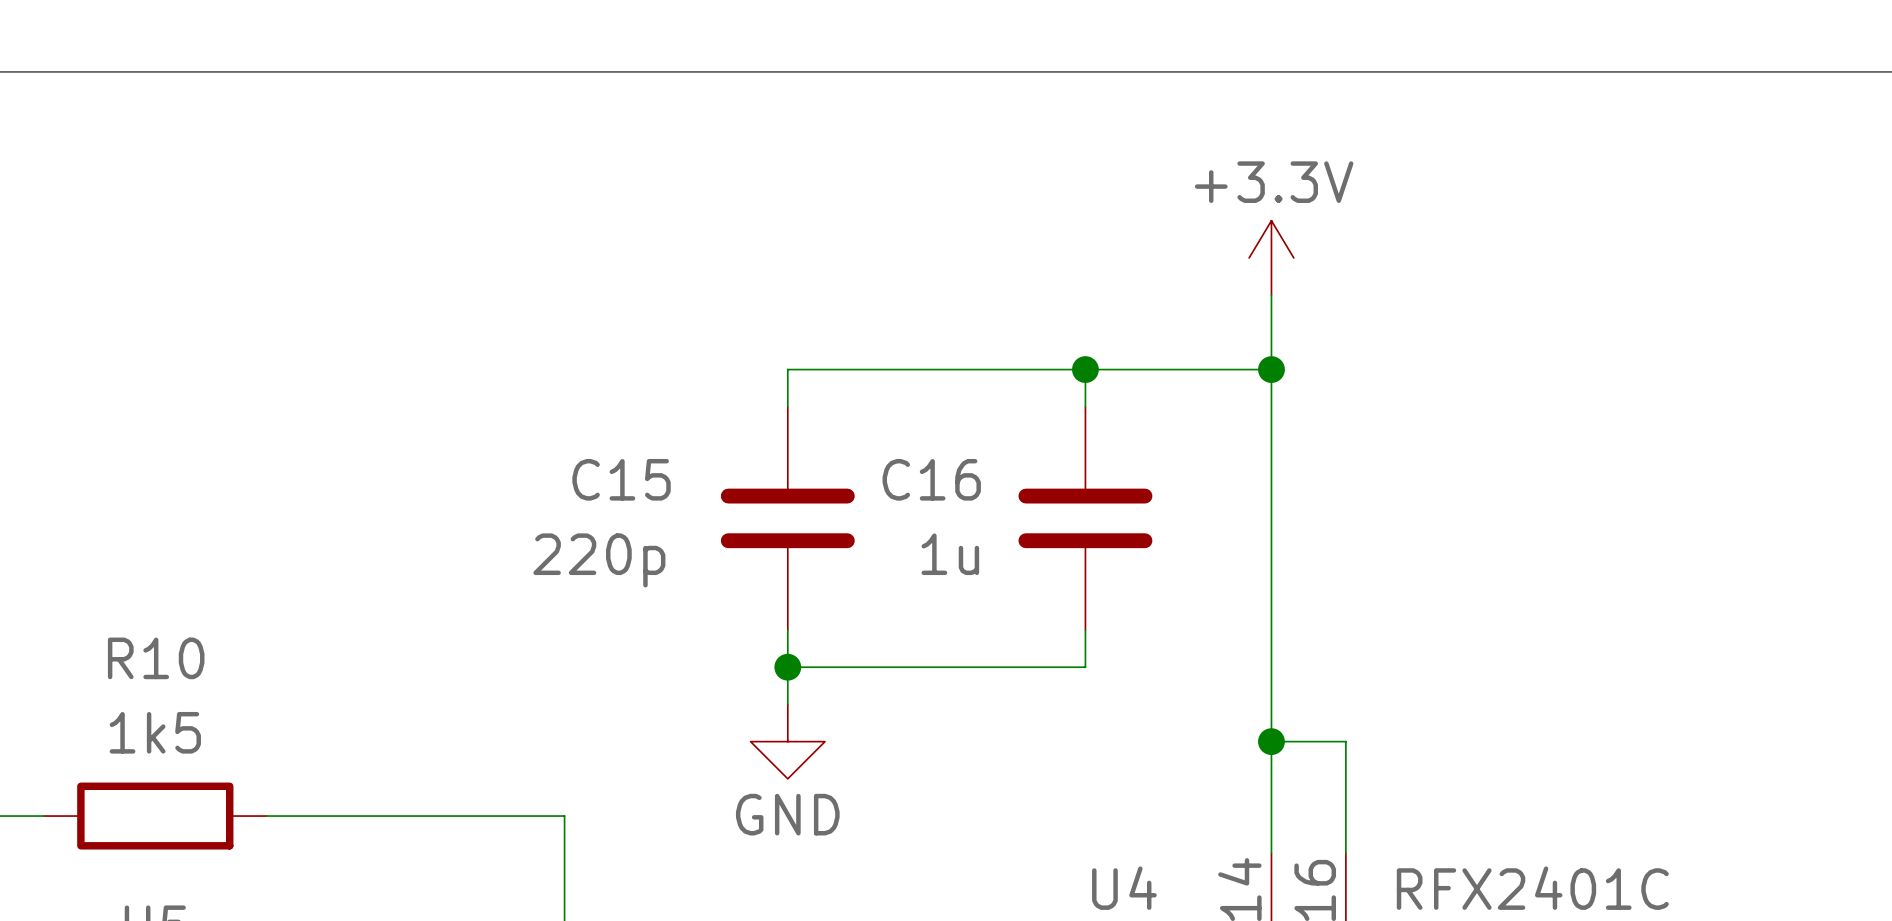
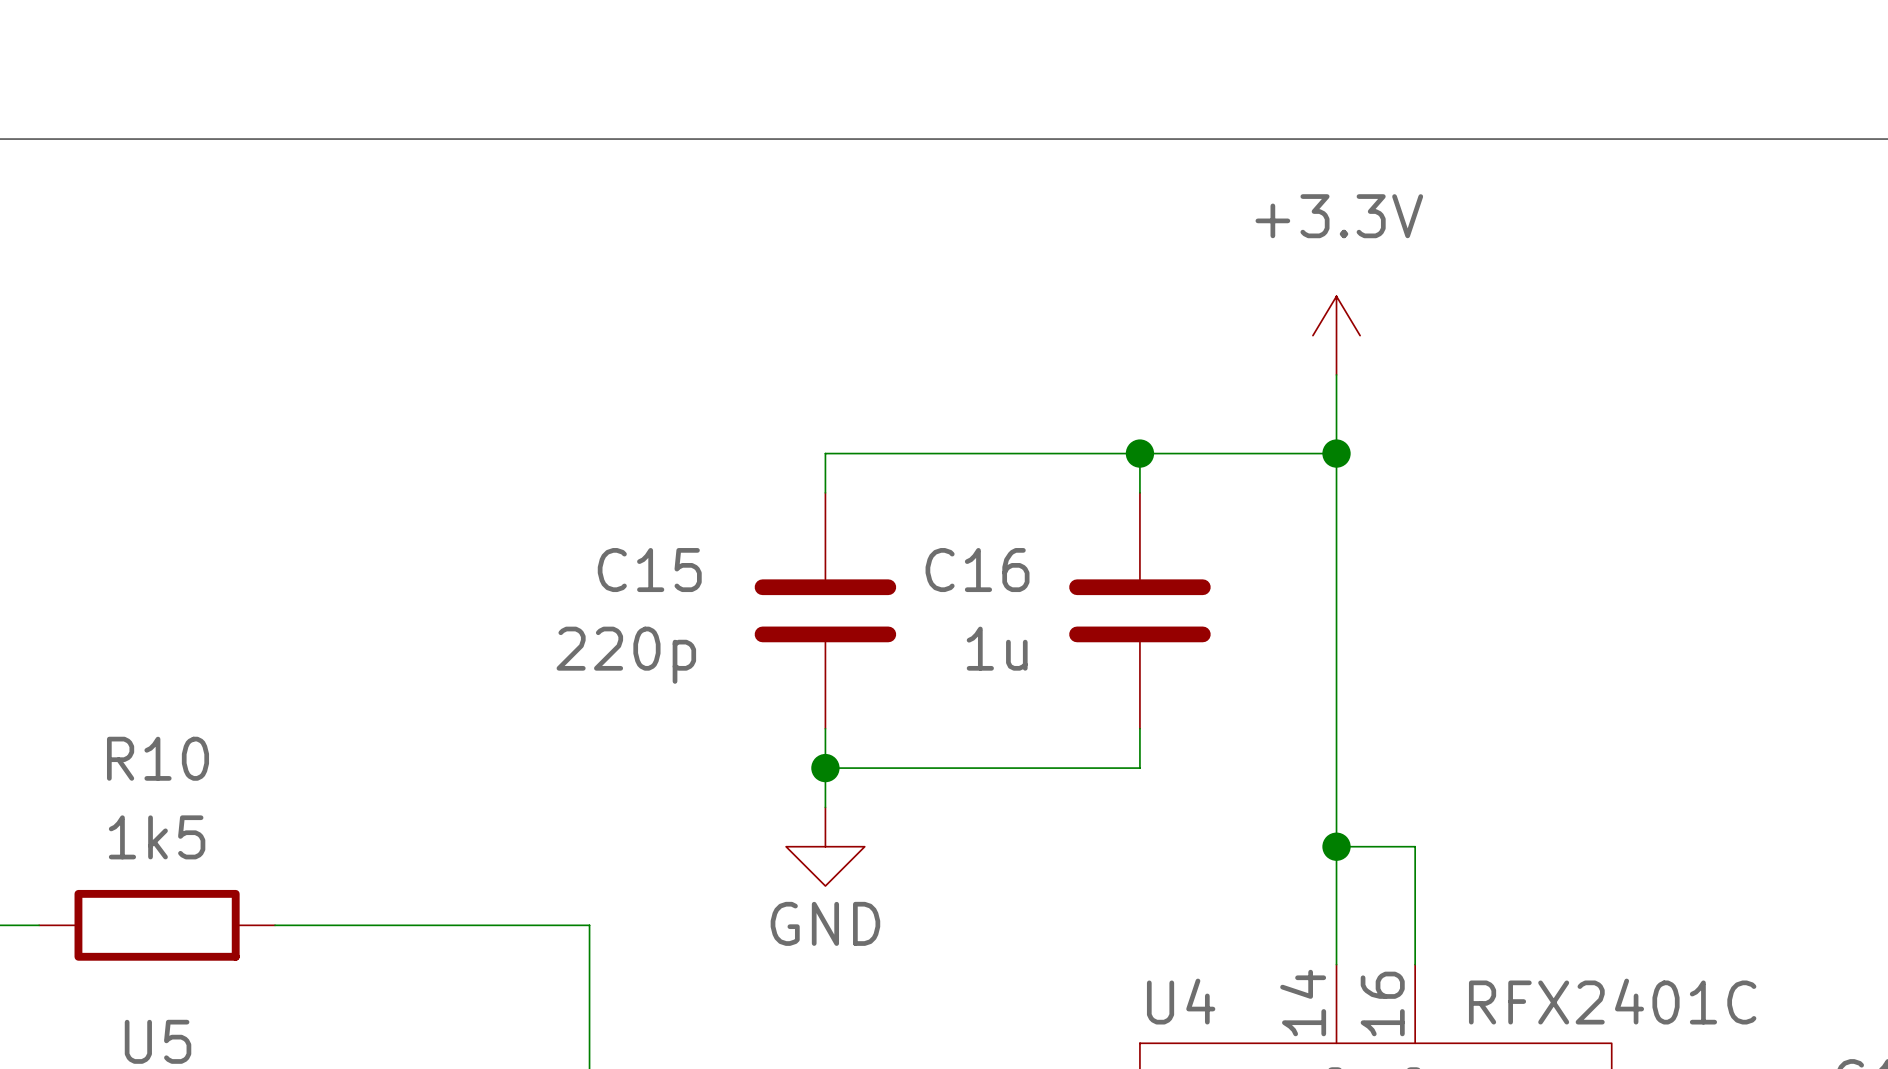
power symbol text position: +3.3V (1274, 182) -> +3.3V (1339, 216)

